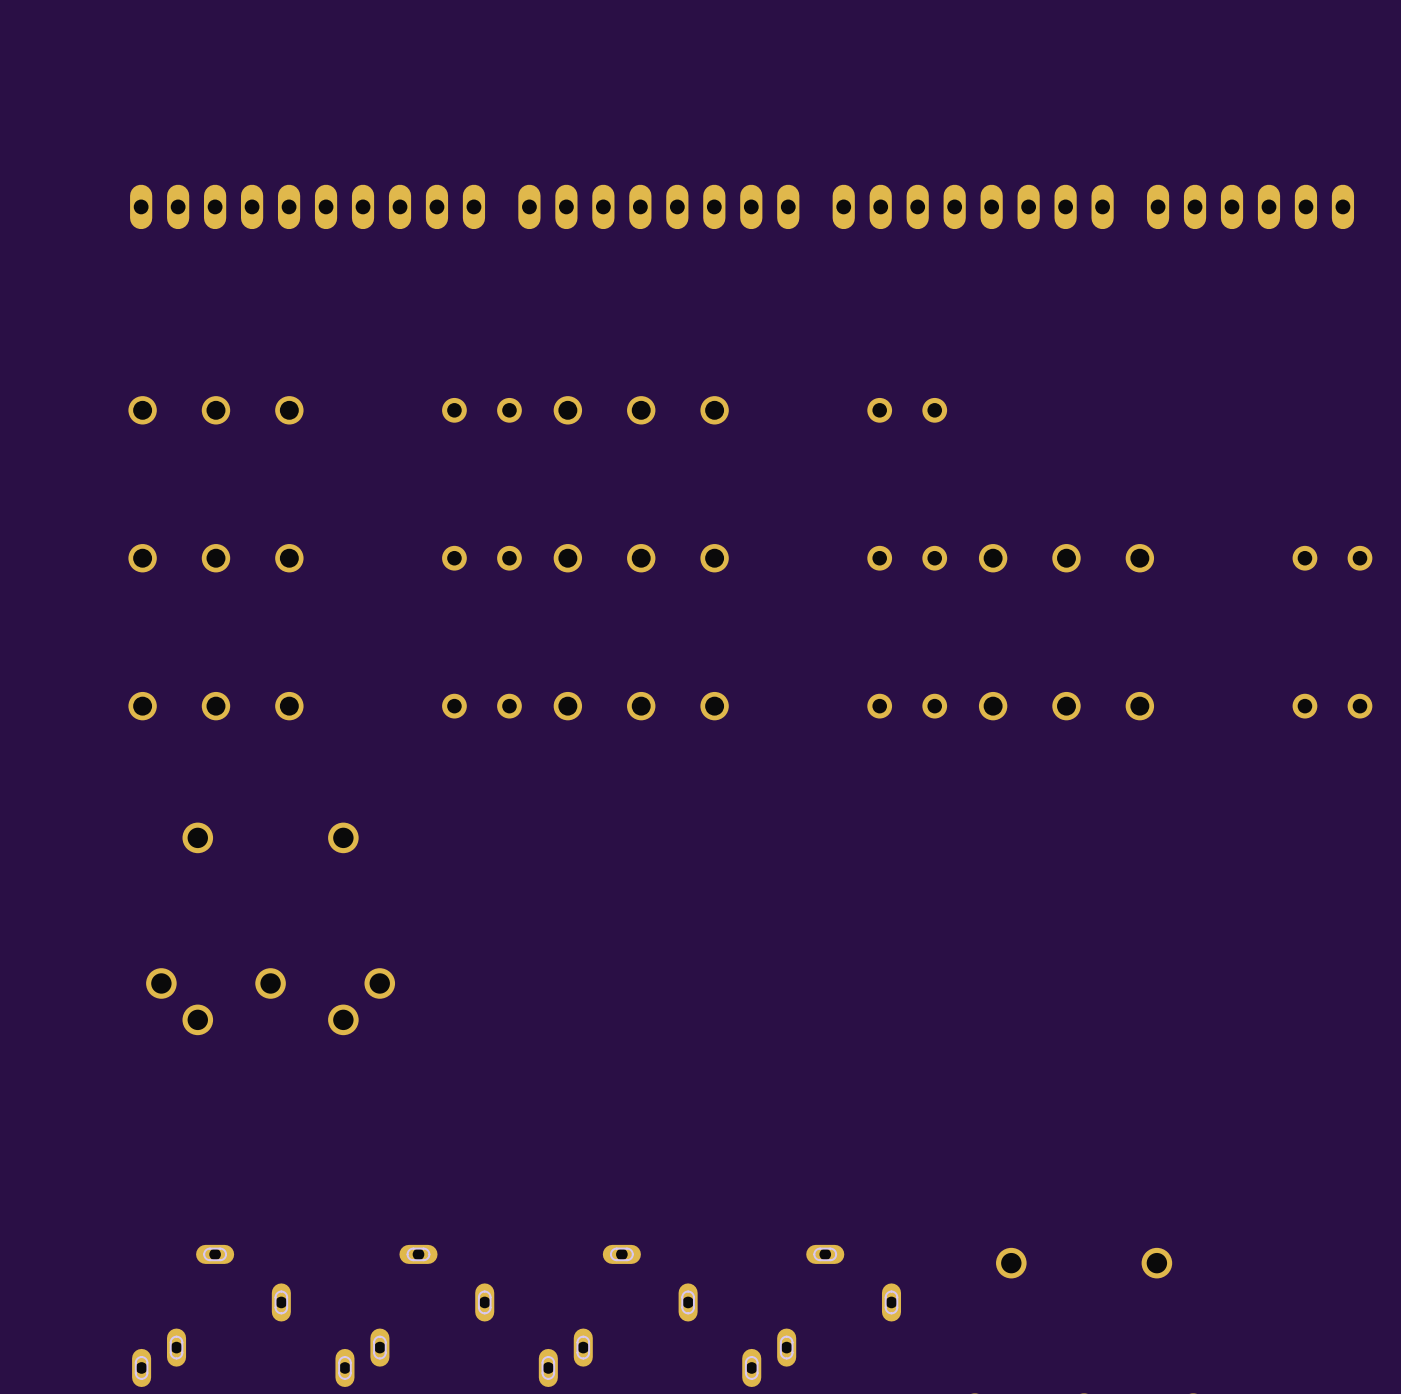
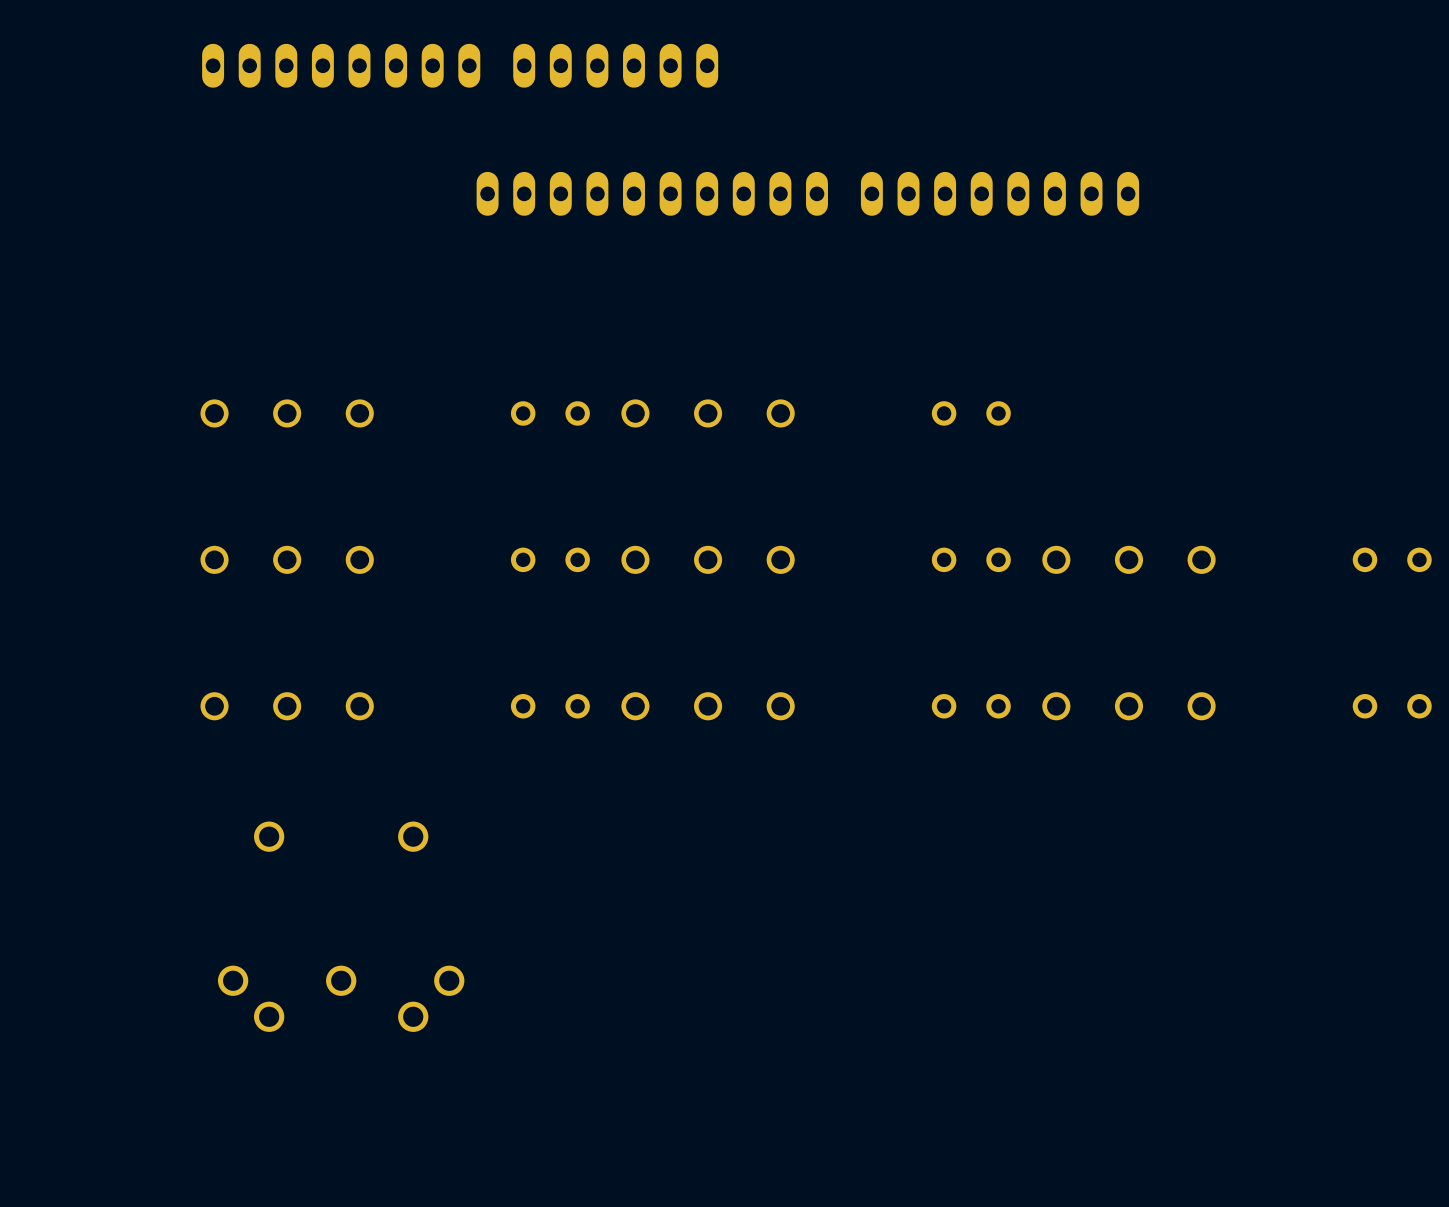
part: none -> (341, 65)
part: none -> (615, 65)
part position: (307, 206) -> (652, 193)
part: (658, 206) -> none
part position: (973, 206) -> (1000, 193)
part: (1250, 206) -> none

